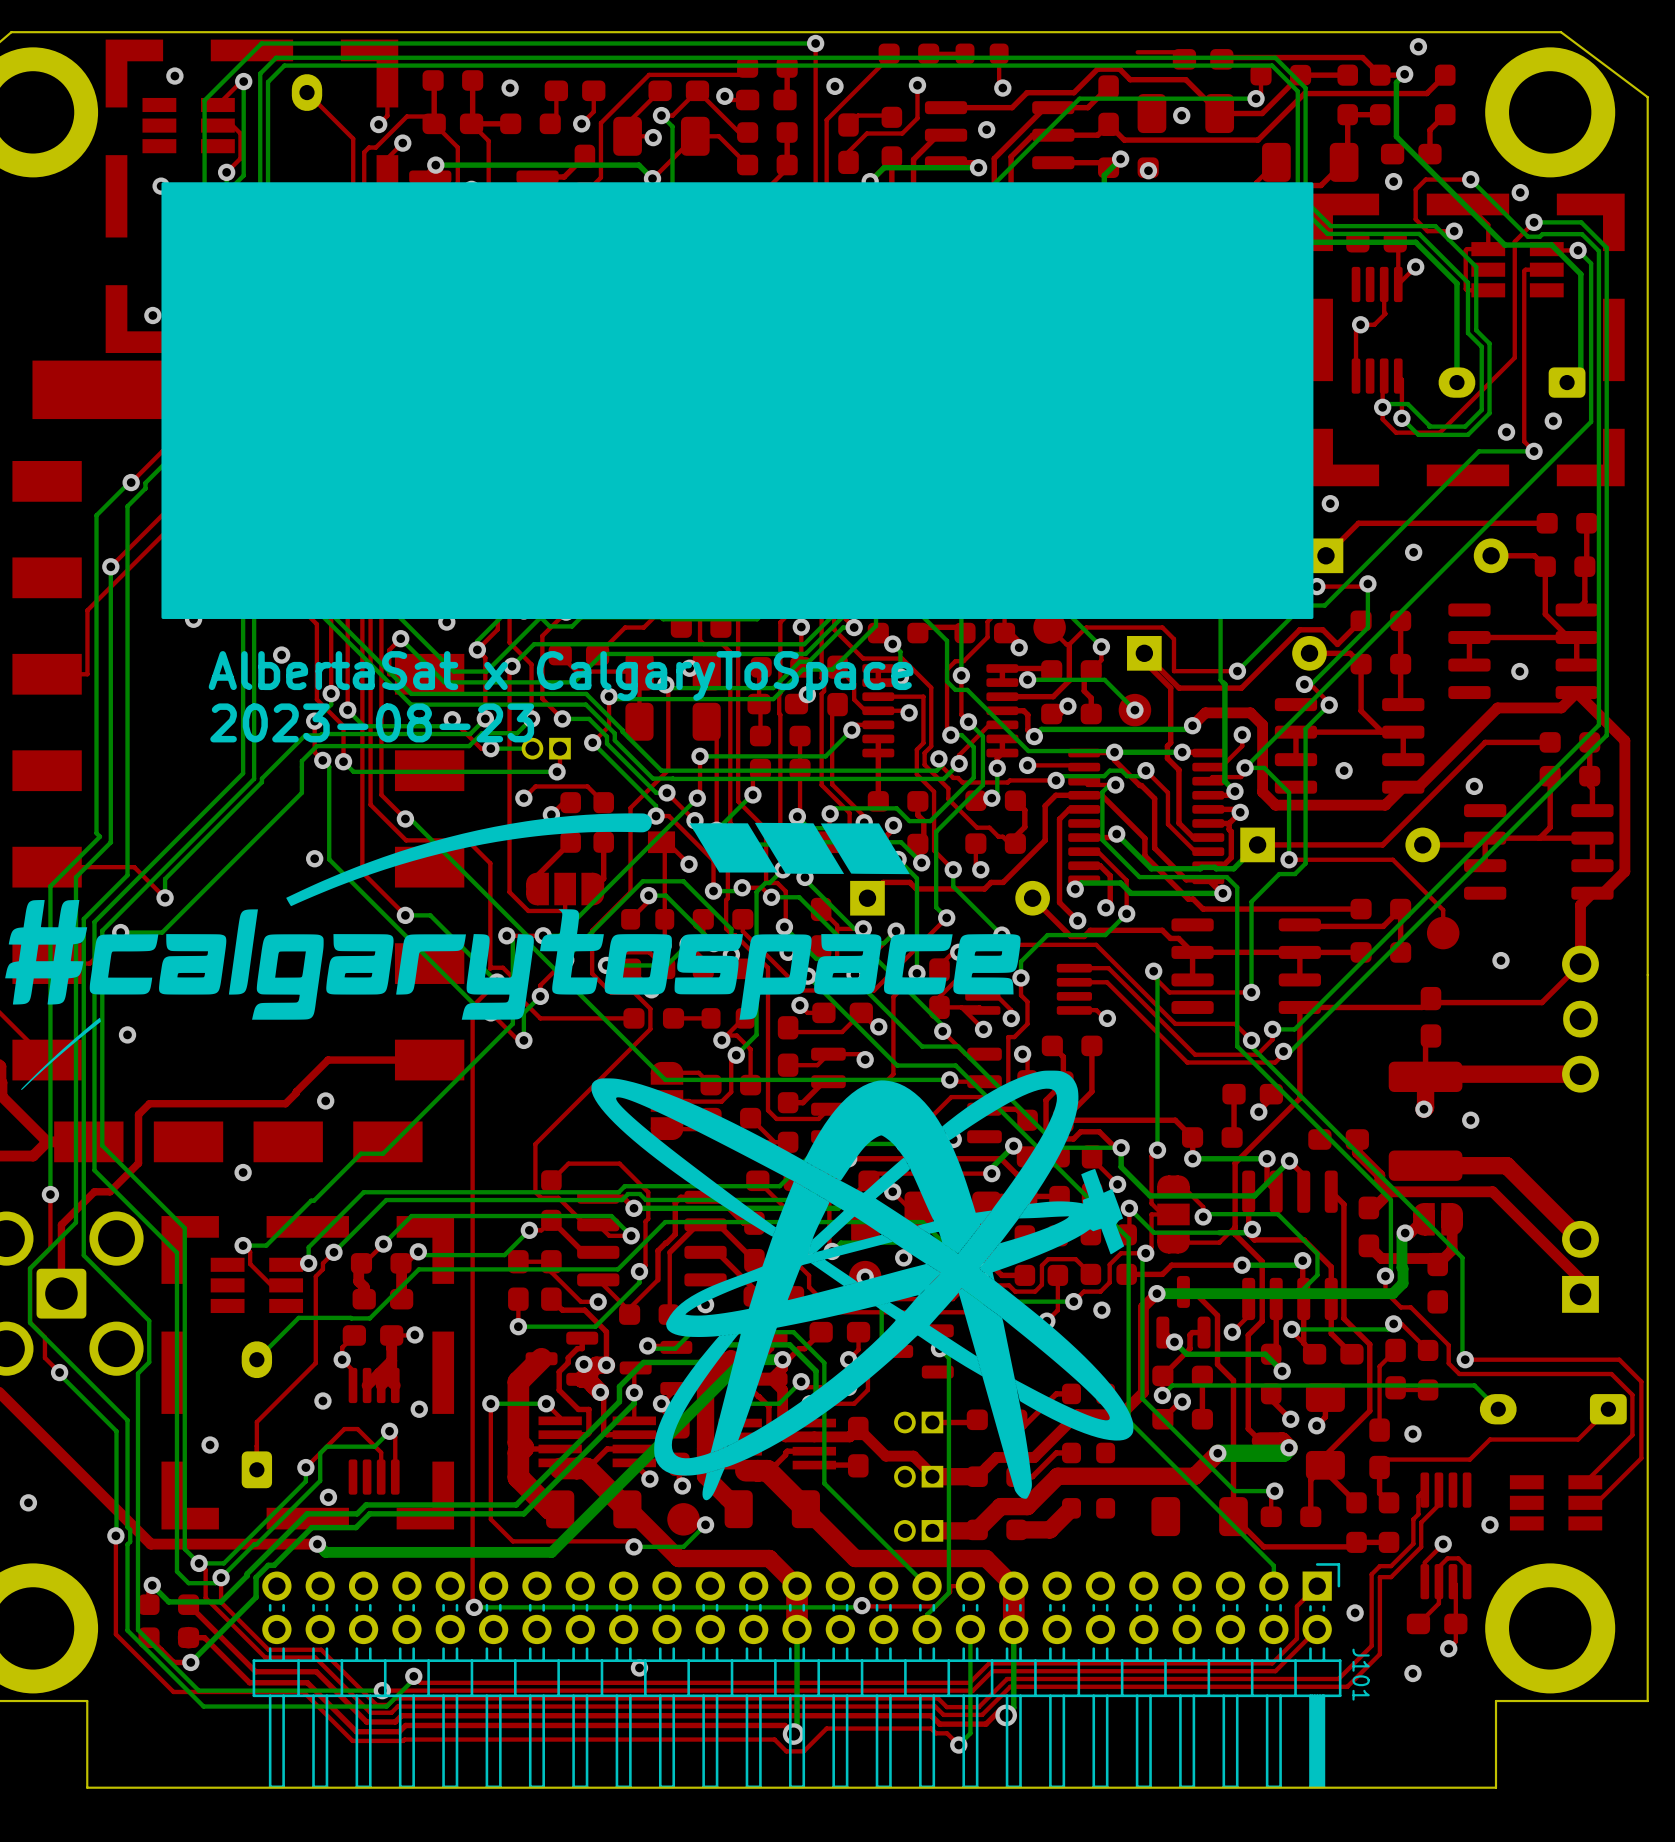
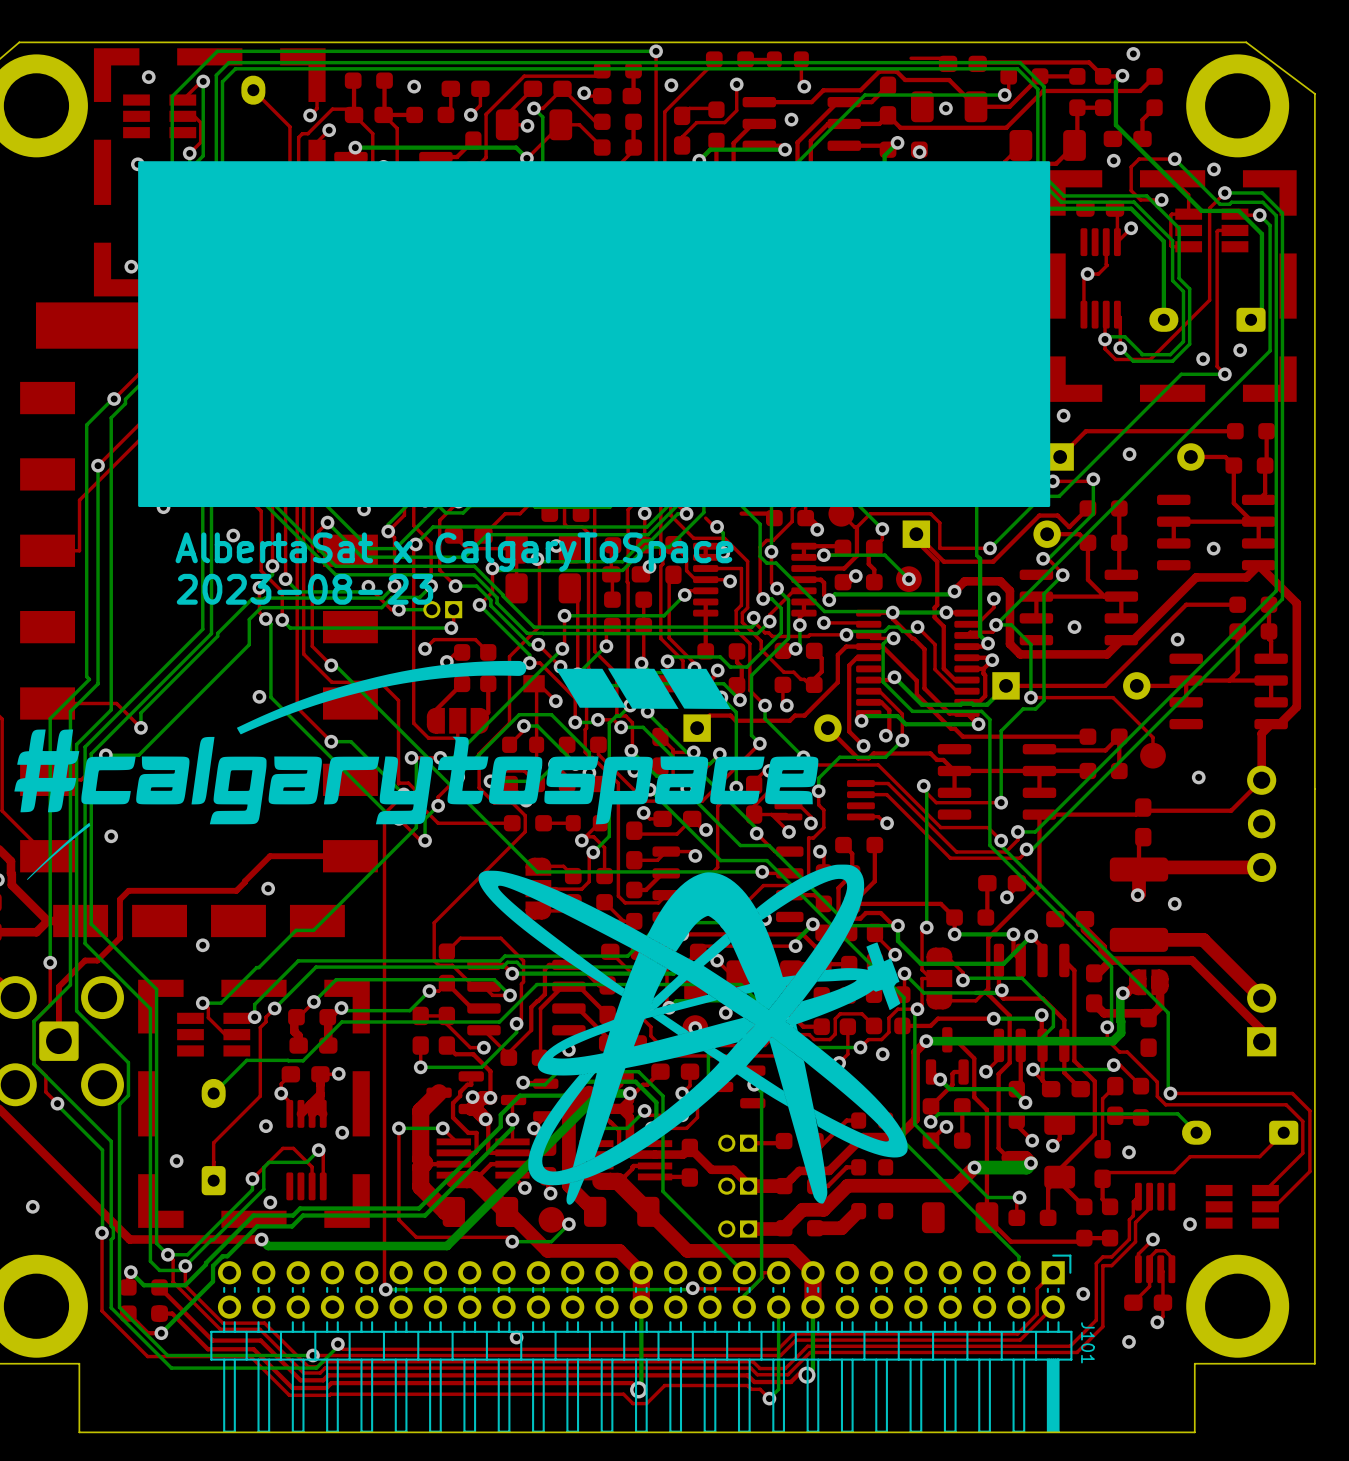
part: (898, 633) -> none

